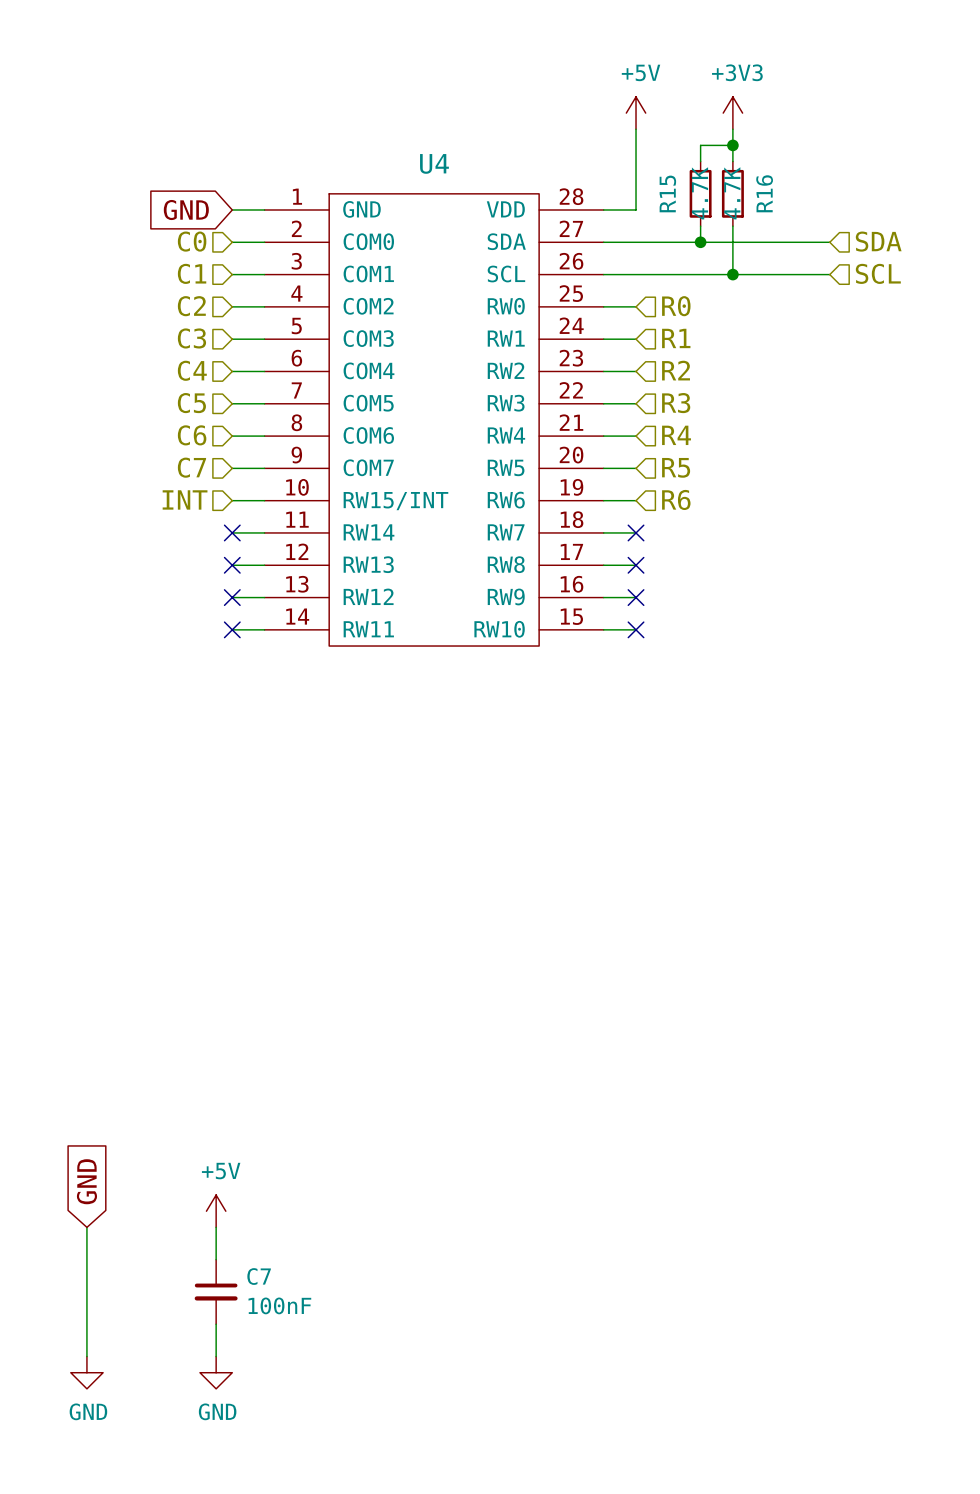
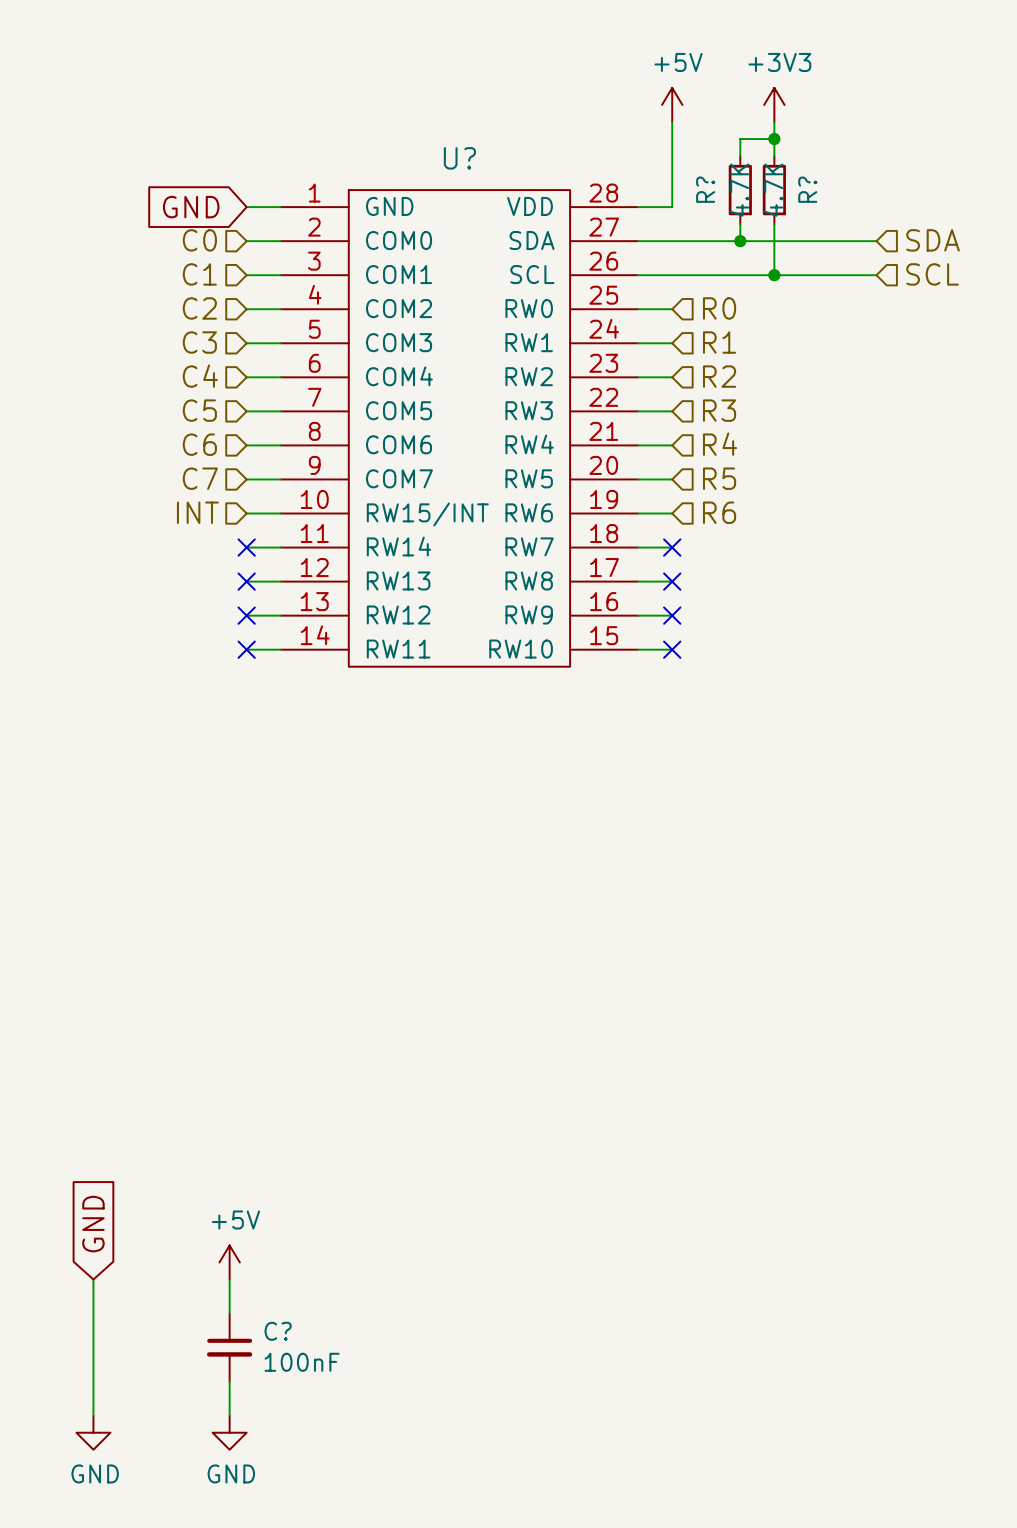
U4 name: U4 (434, 163) -> U? (459, 158)
R15 name: R15 (667, 193) -> R? (705, 189)
R16 name: R16 (764, 193) -> R? (807, 189)
C7 name: C7 (259, 1276) -> C? (278, 1331)

